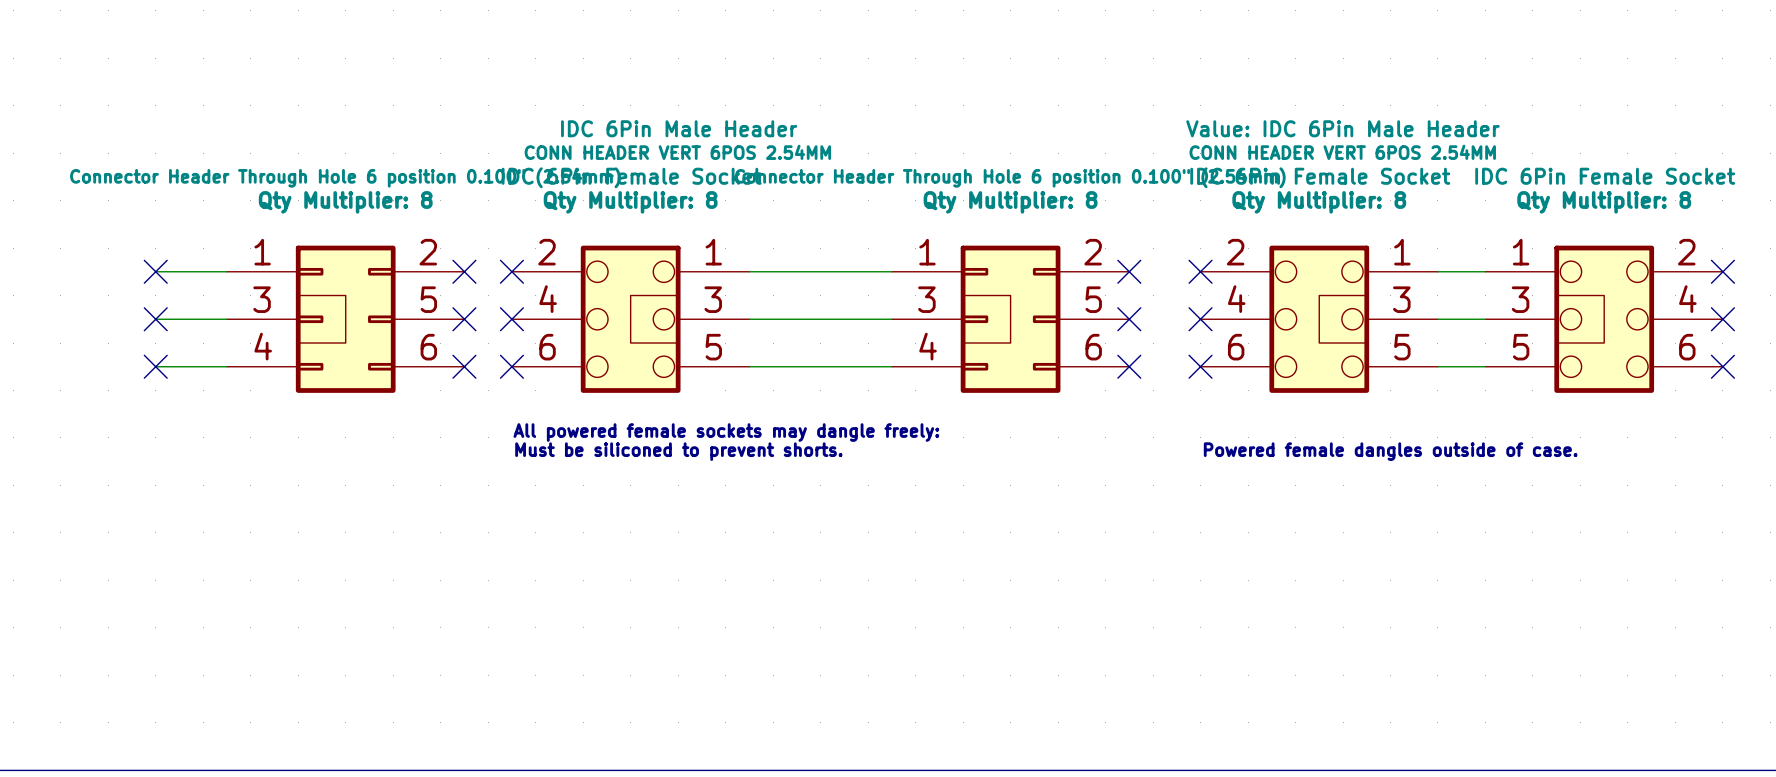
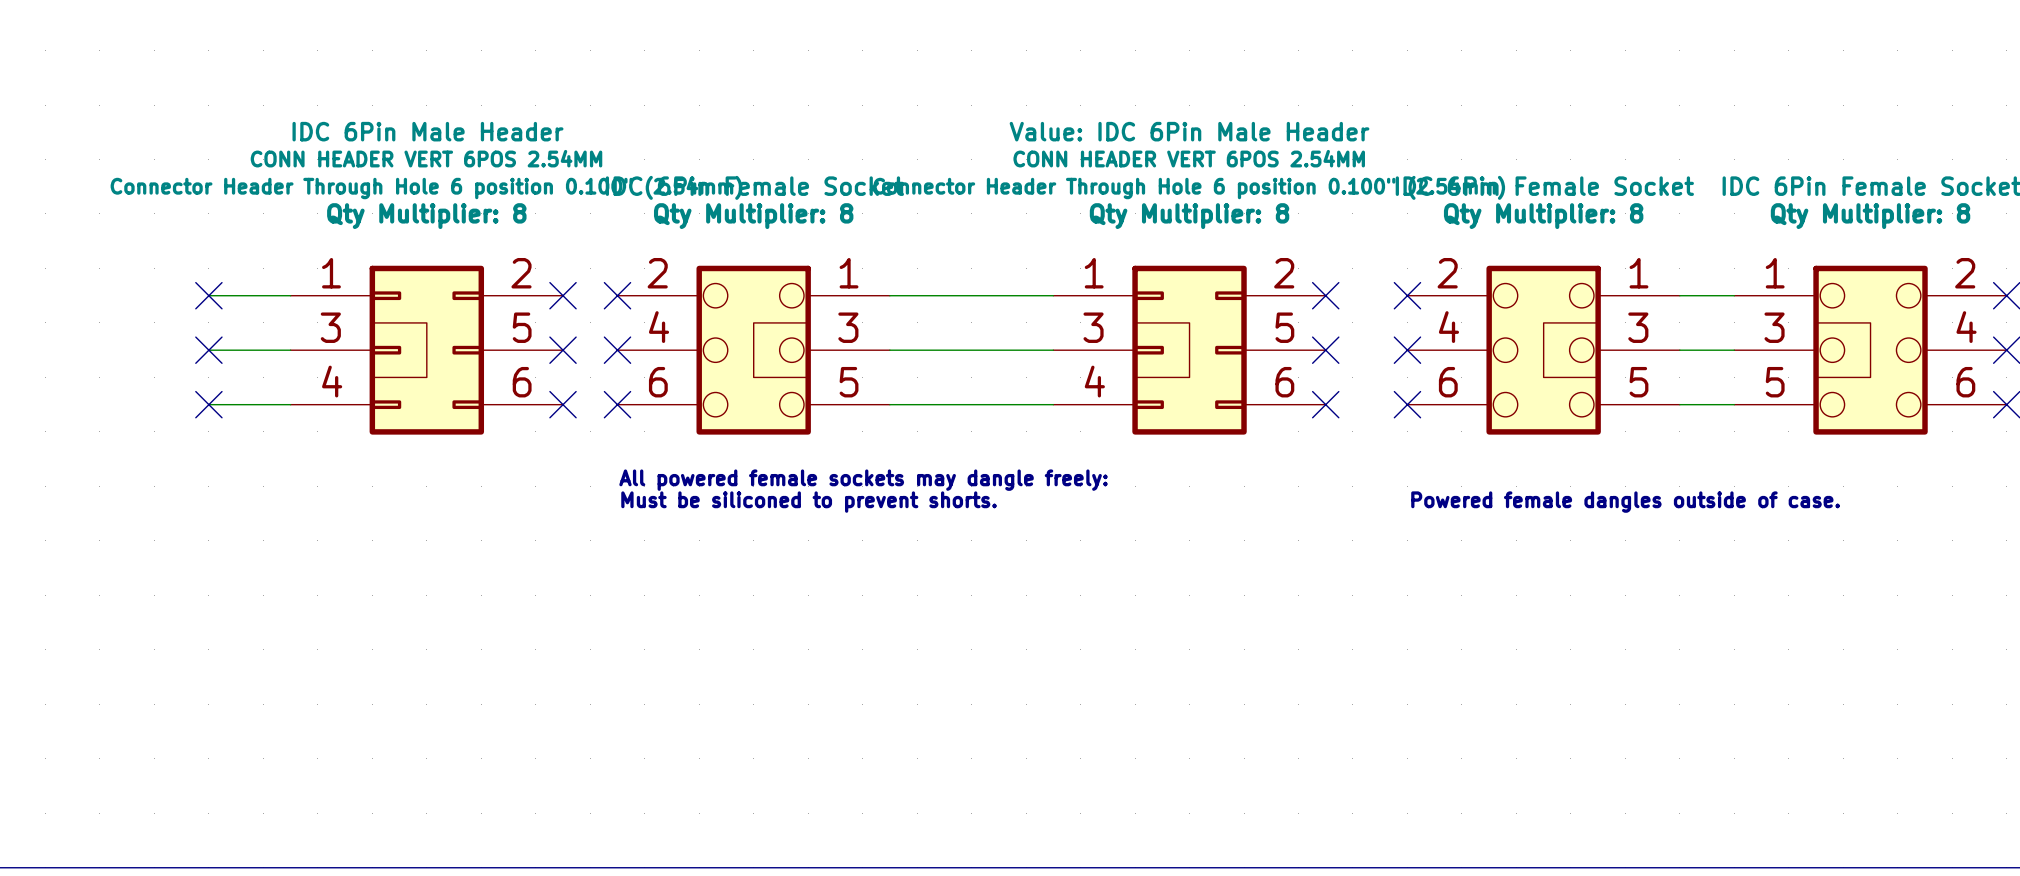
part value position: IDC 6Pin Male Header (679, 128) -> IDC 6Pin Male Header (427, 131)
part value position: Value: IDC 6Pin Male Header (1343, 128) -> Value: IDC 6Pin Male Header (1189, 131)
part text position: CONN HEADER VERT 6POS 2.54MM (677, 152) -> CONN HEADER VERT 6POS 2.54MM (426, 158)
part text position: CONN HEADER VERT 6POS 2.54MM (1342, 152) -> CONN HEADER VERT 6POS 2.54MM (1189, 158)

